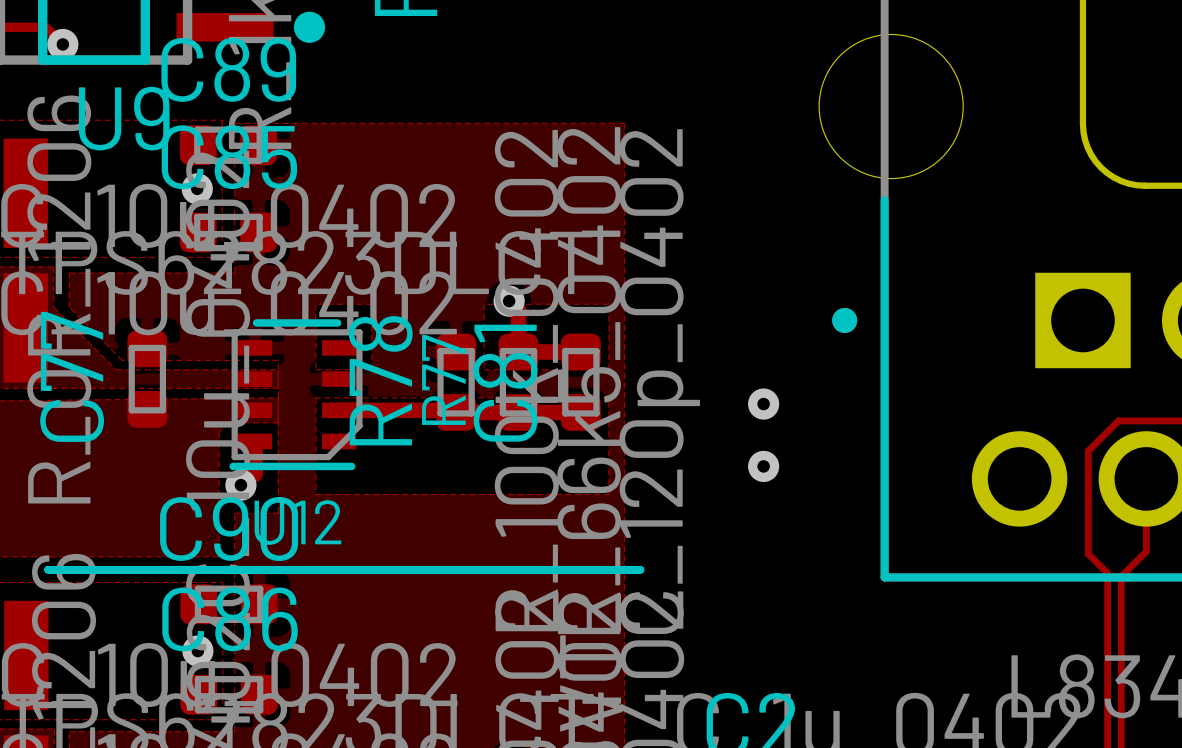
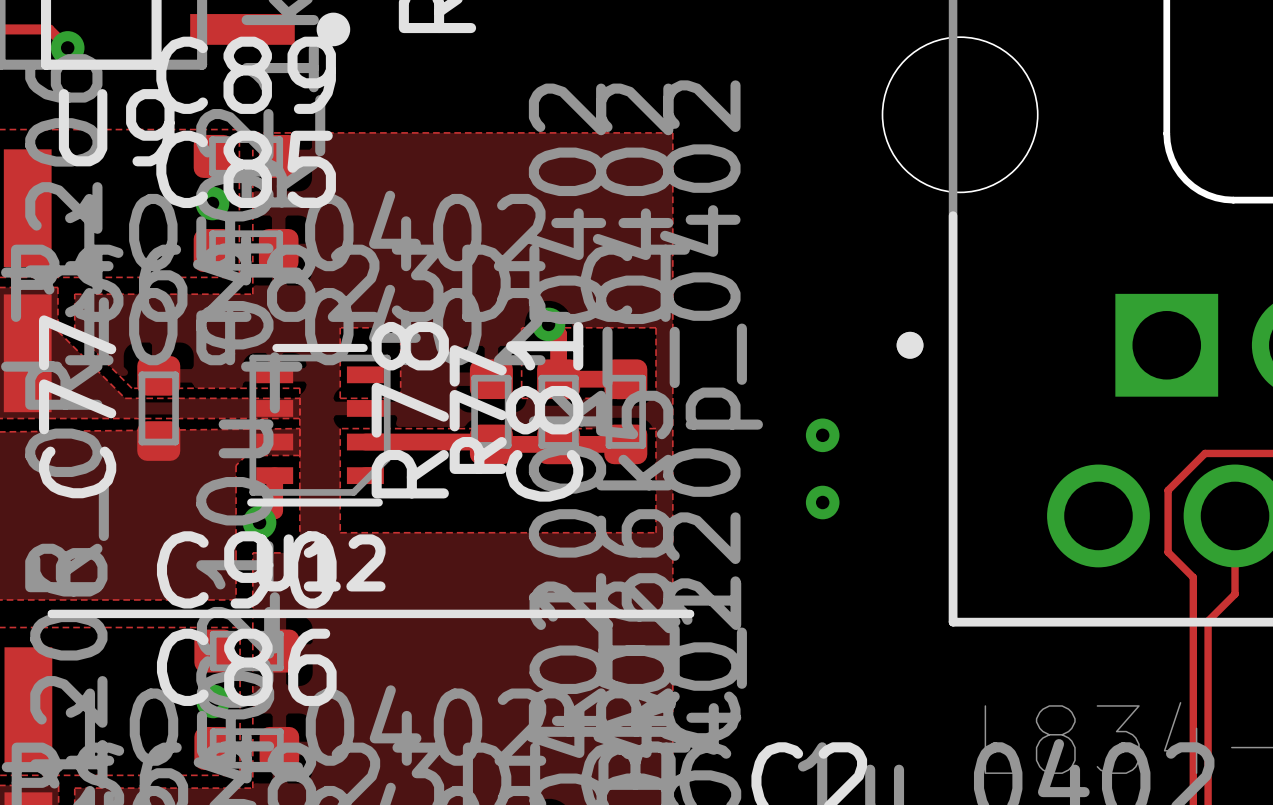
track: (1088, 451) (1088, 554) (1107, 573) -> (1172, 485) (1168, 490) (1168, 552) (1193, 577) (1193, 617)

